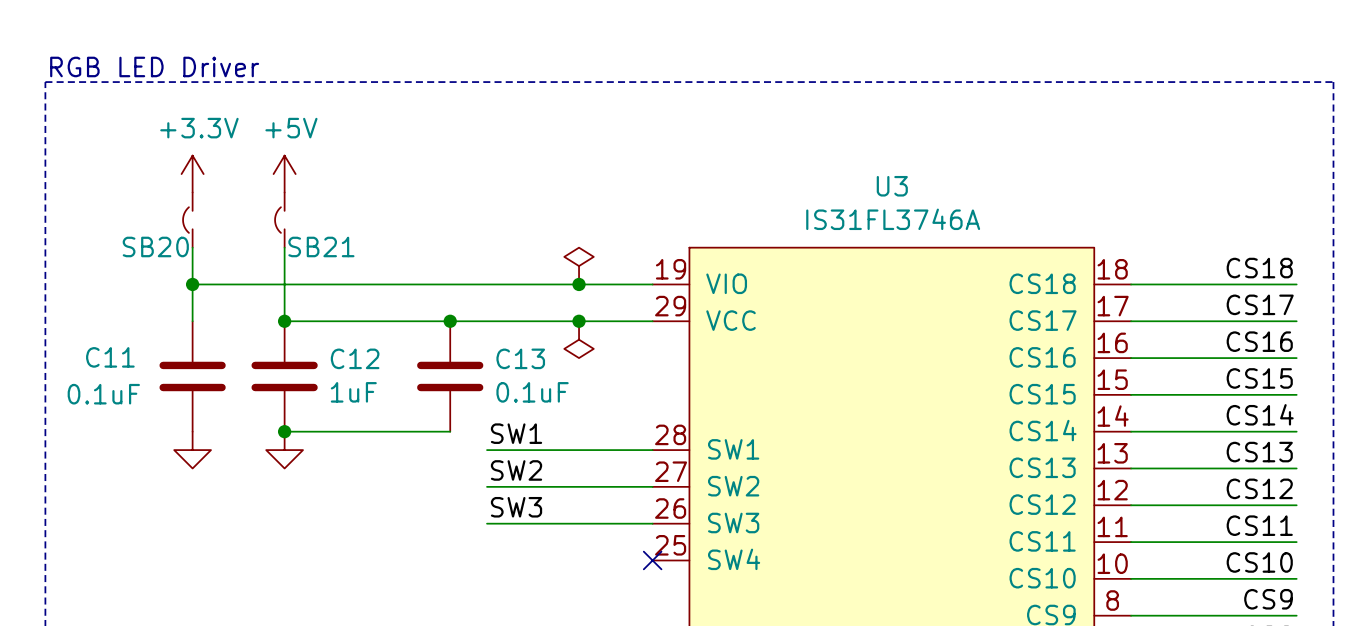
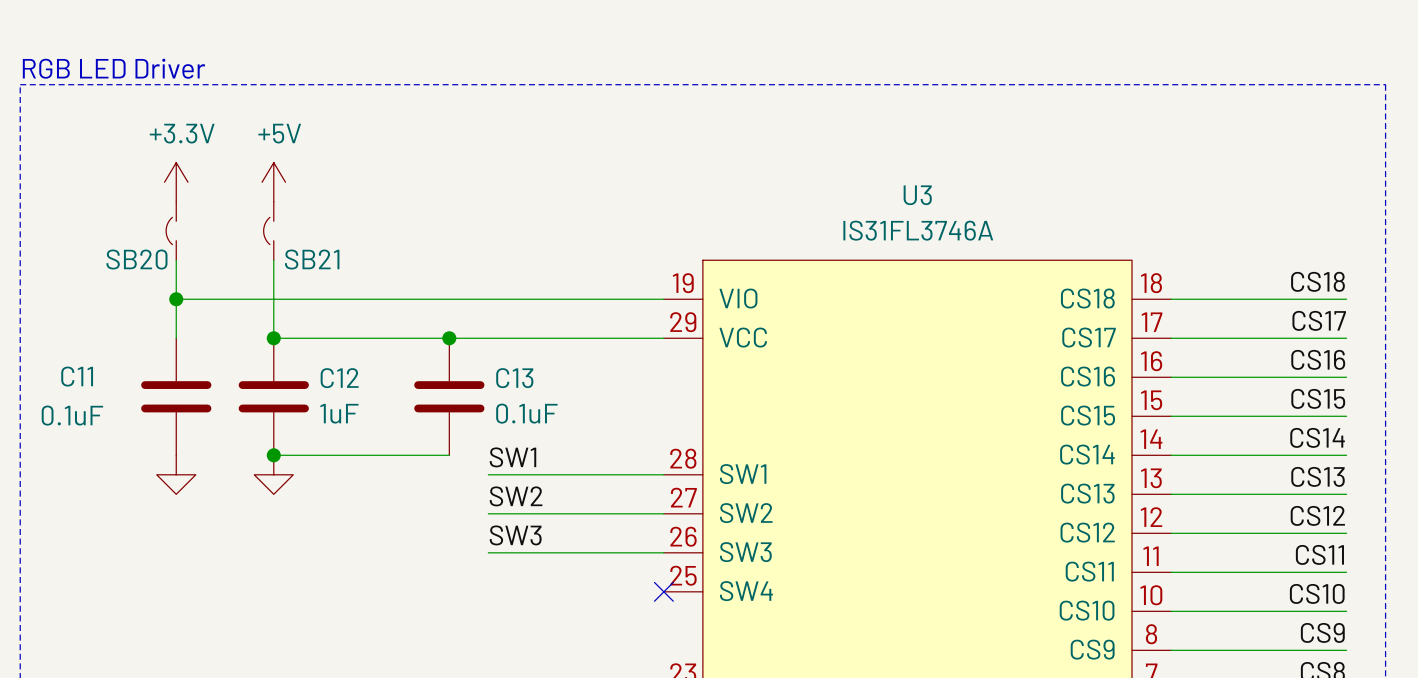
power symbol: (579, 266) -> none
junction: (579, 284) -> none
junction: (579, 321) -> none
power symbol: (579, 339) -> none

